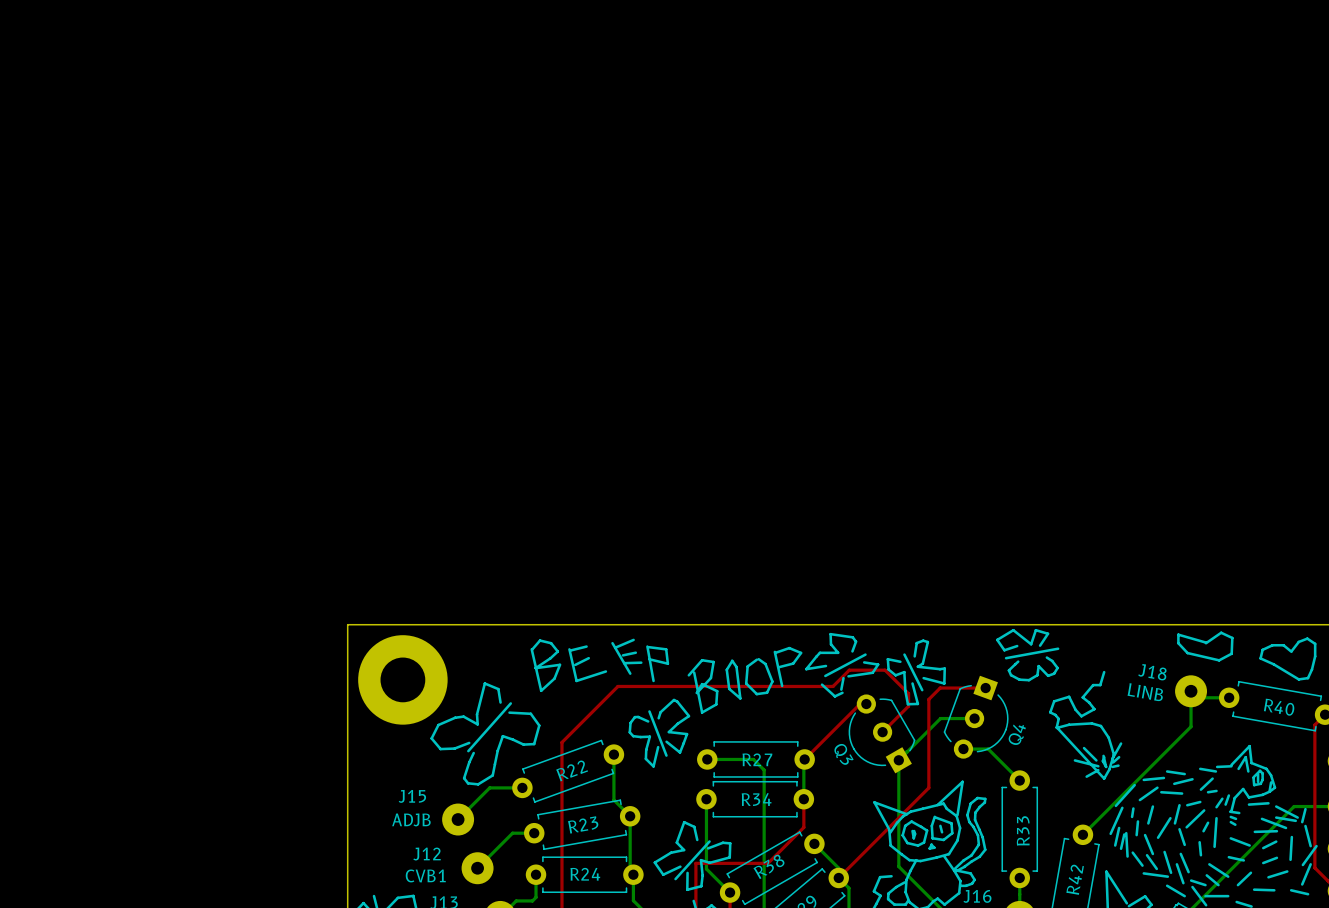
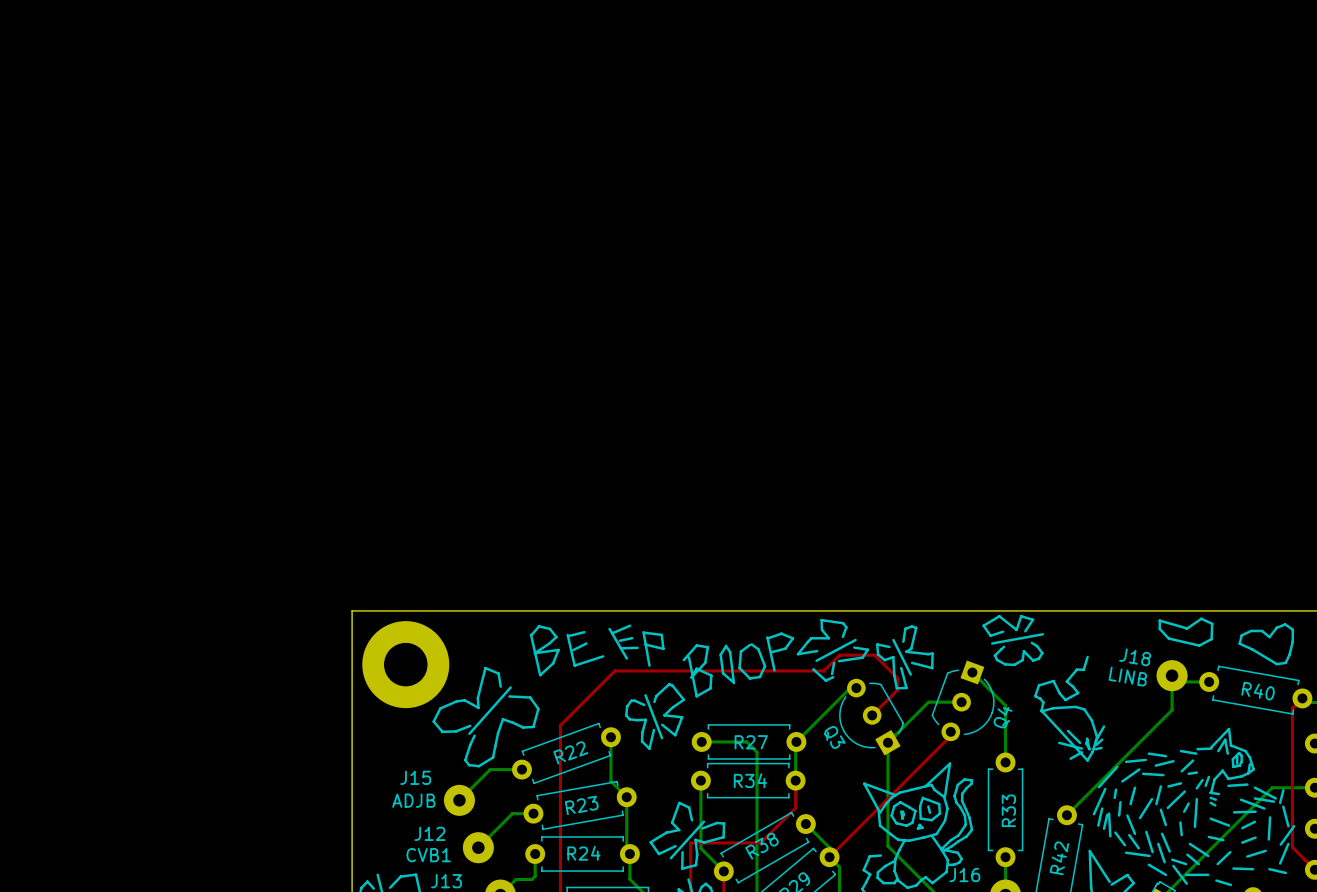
top track: (985, 688) (940, 688) (928, 699) (928, 787) -> (950, 735) (917, 769)
bottom track: none -> (850, 688) (796, 741)
top track: (866, 704) (860, 704) (804, 759) -> none
bottom track: (963, 749) (988, 749) (1019, 780) -> (972, 672) (1005, 705) (1005, 762)

